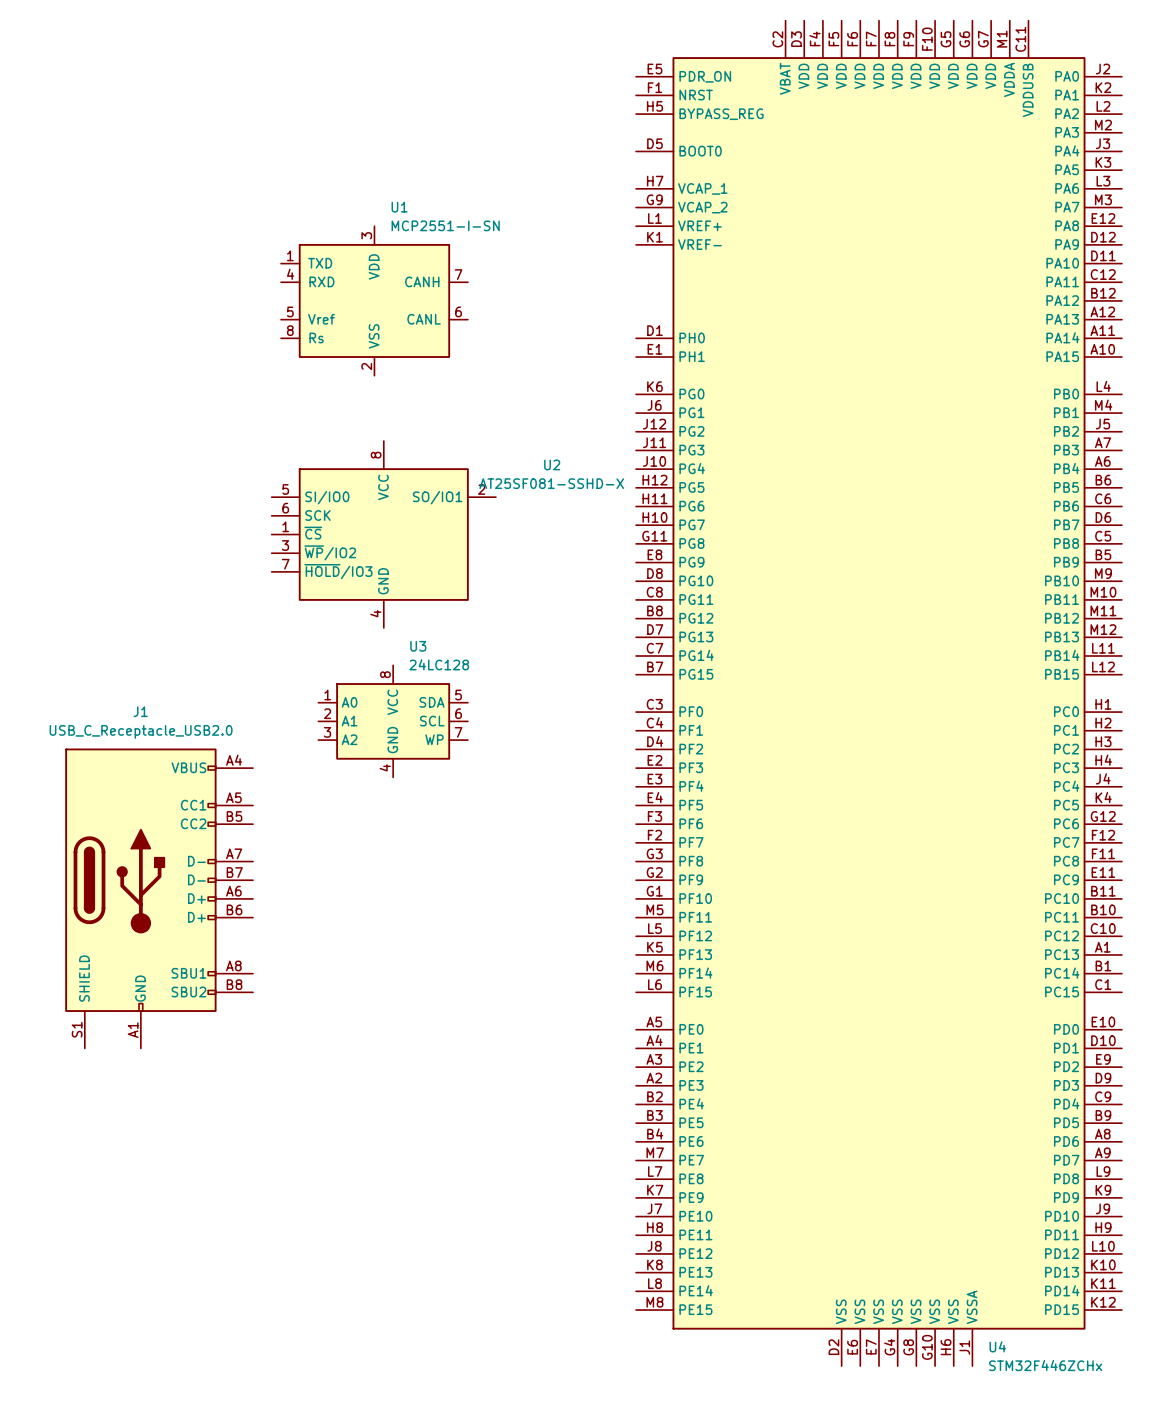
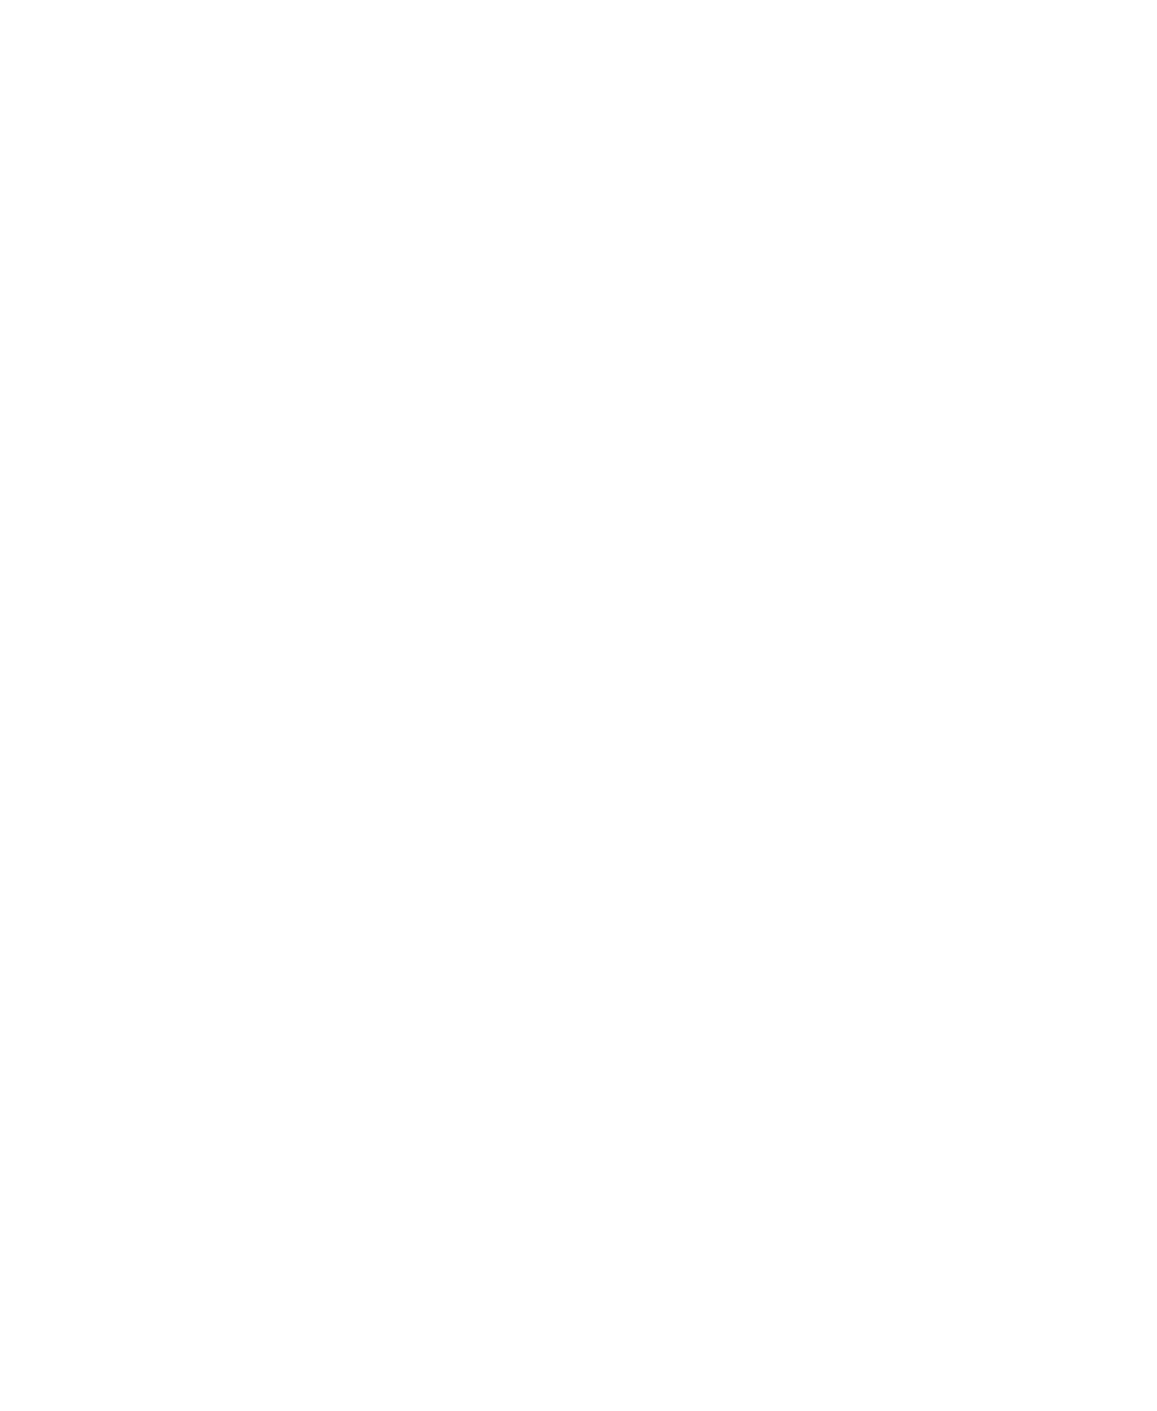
U1: MCP2551-I-SN (374, 300) -> none
U2: AT25SF081-SSHD-X (383, 534) -> none
U4: STM32F446ZCHx (878, 693) -> none
U3: 24LC128 (393, 721) -> none
J1: USB_C_Receptacle_USB2.0 (159, 898) -> none

